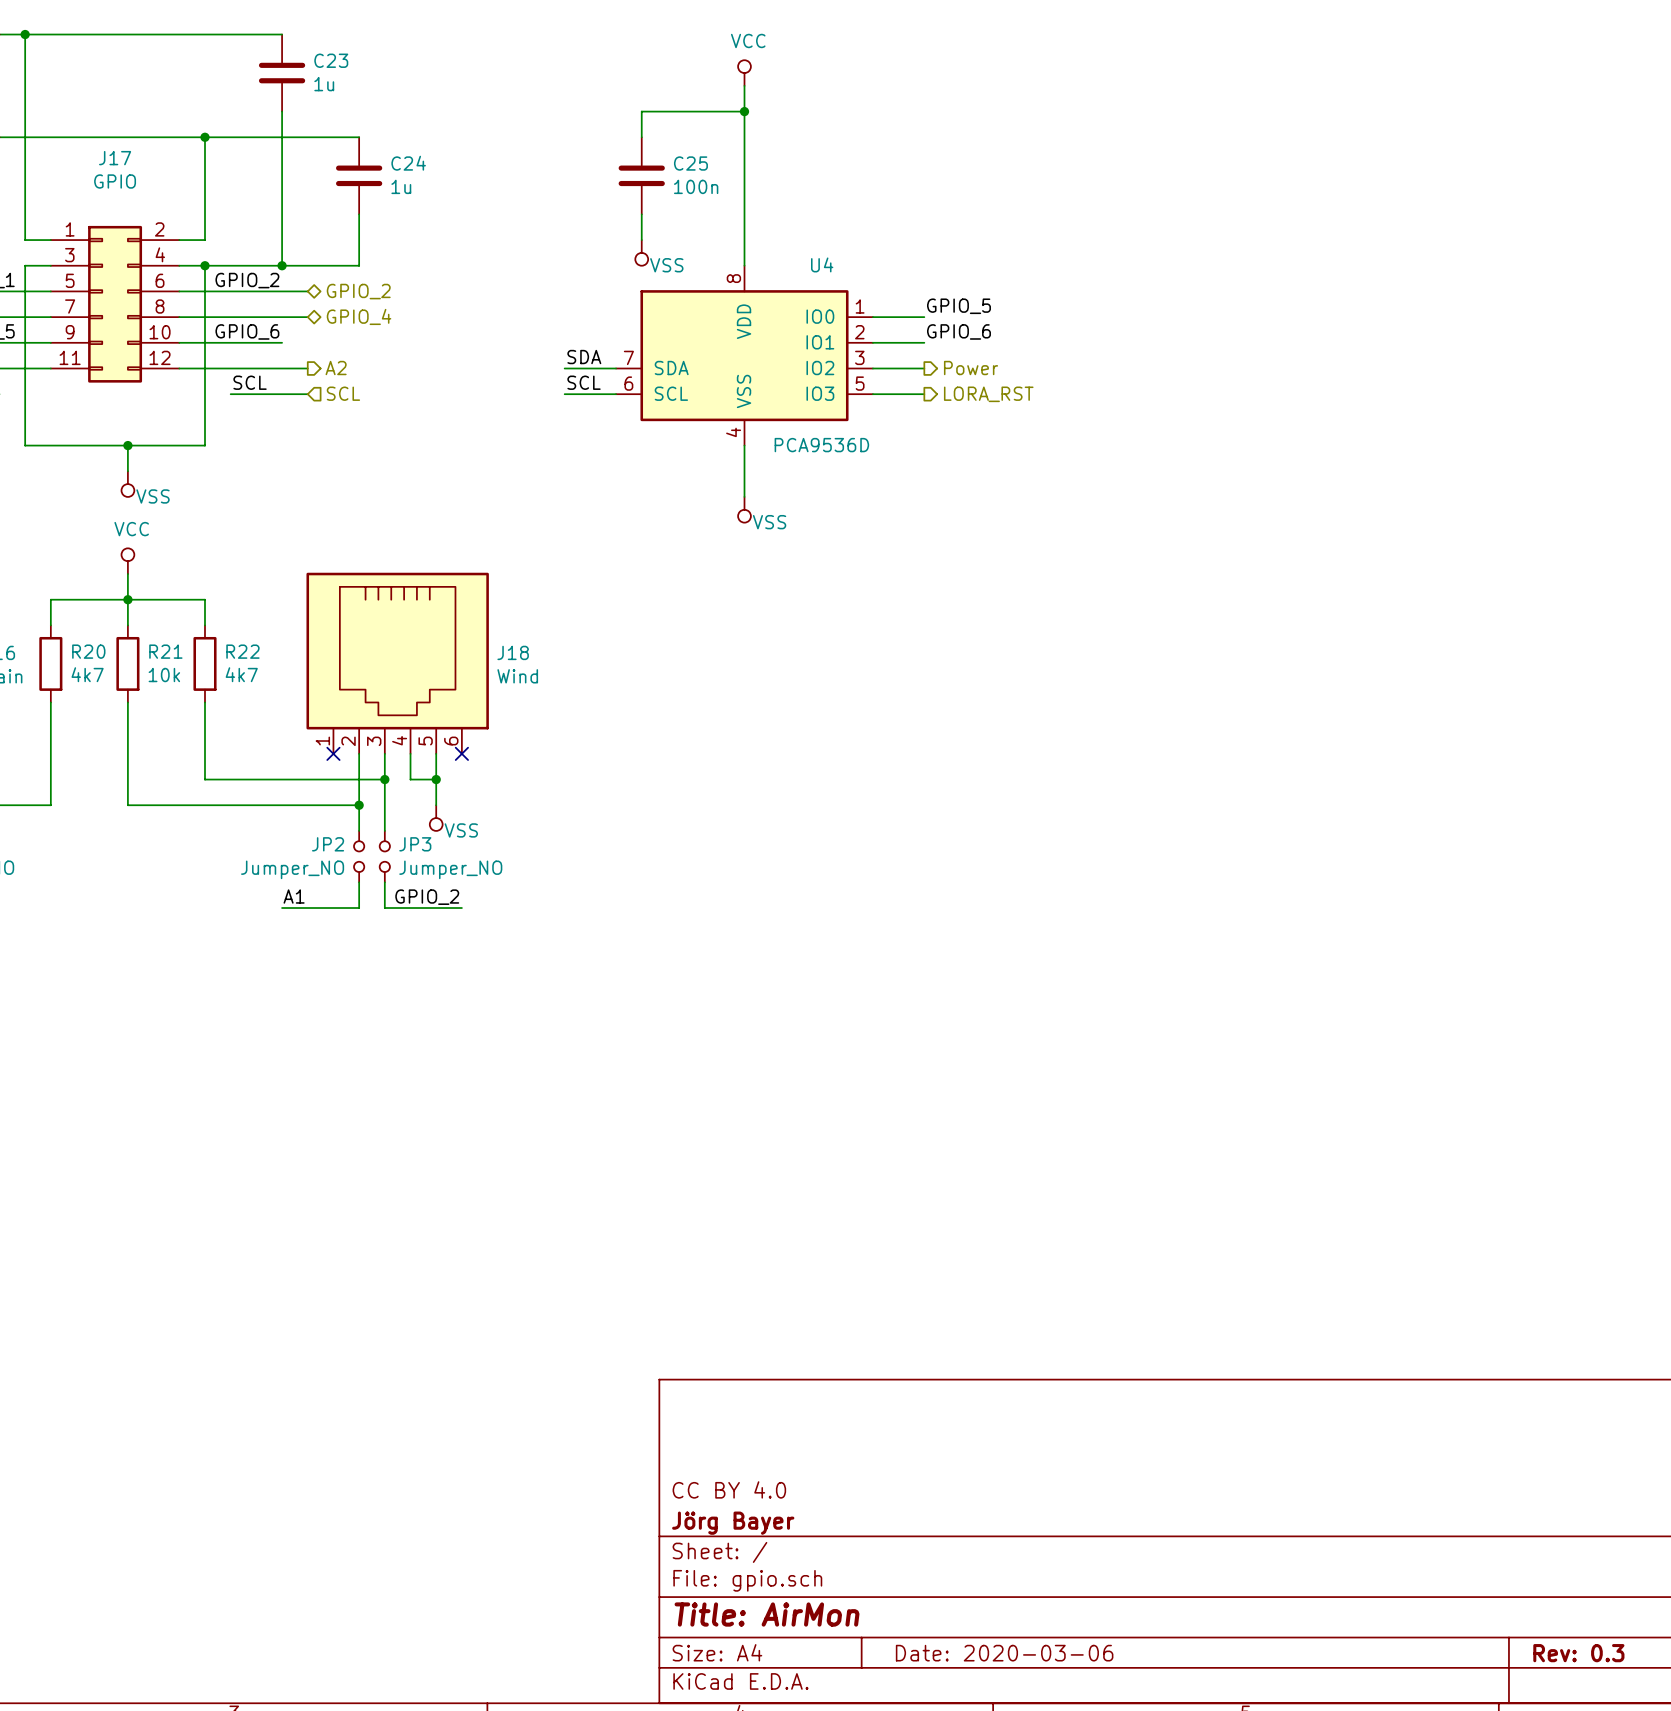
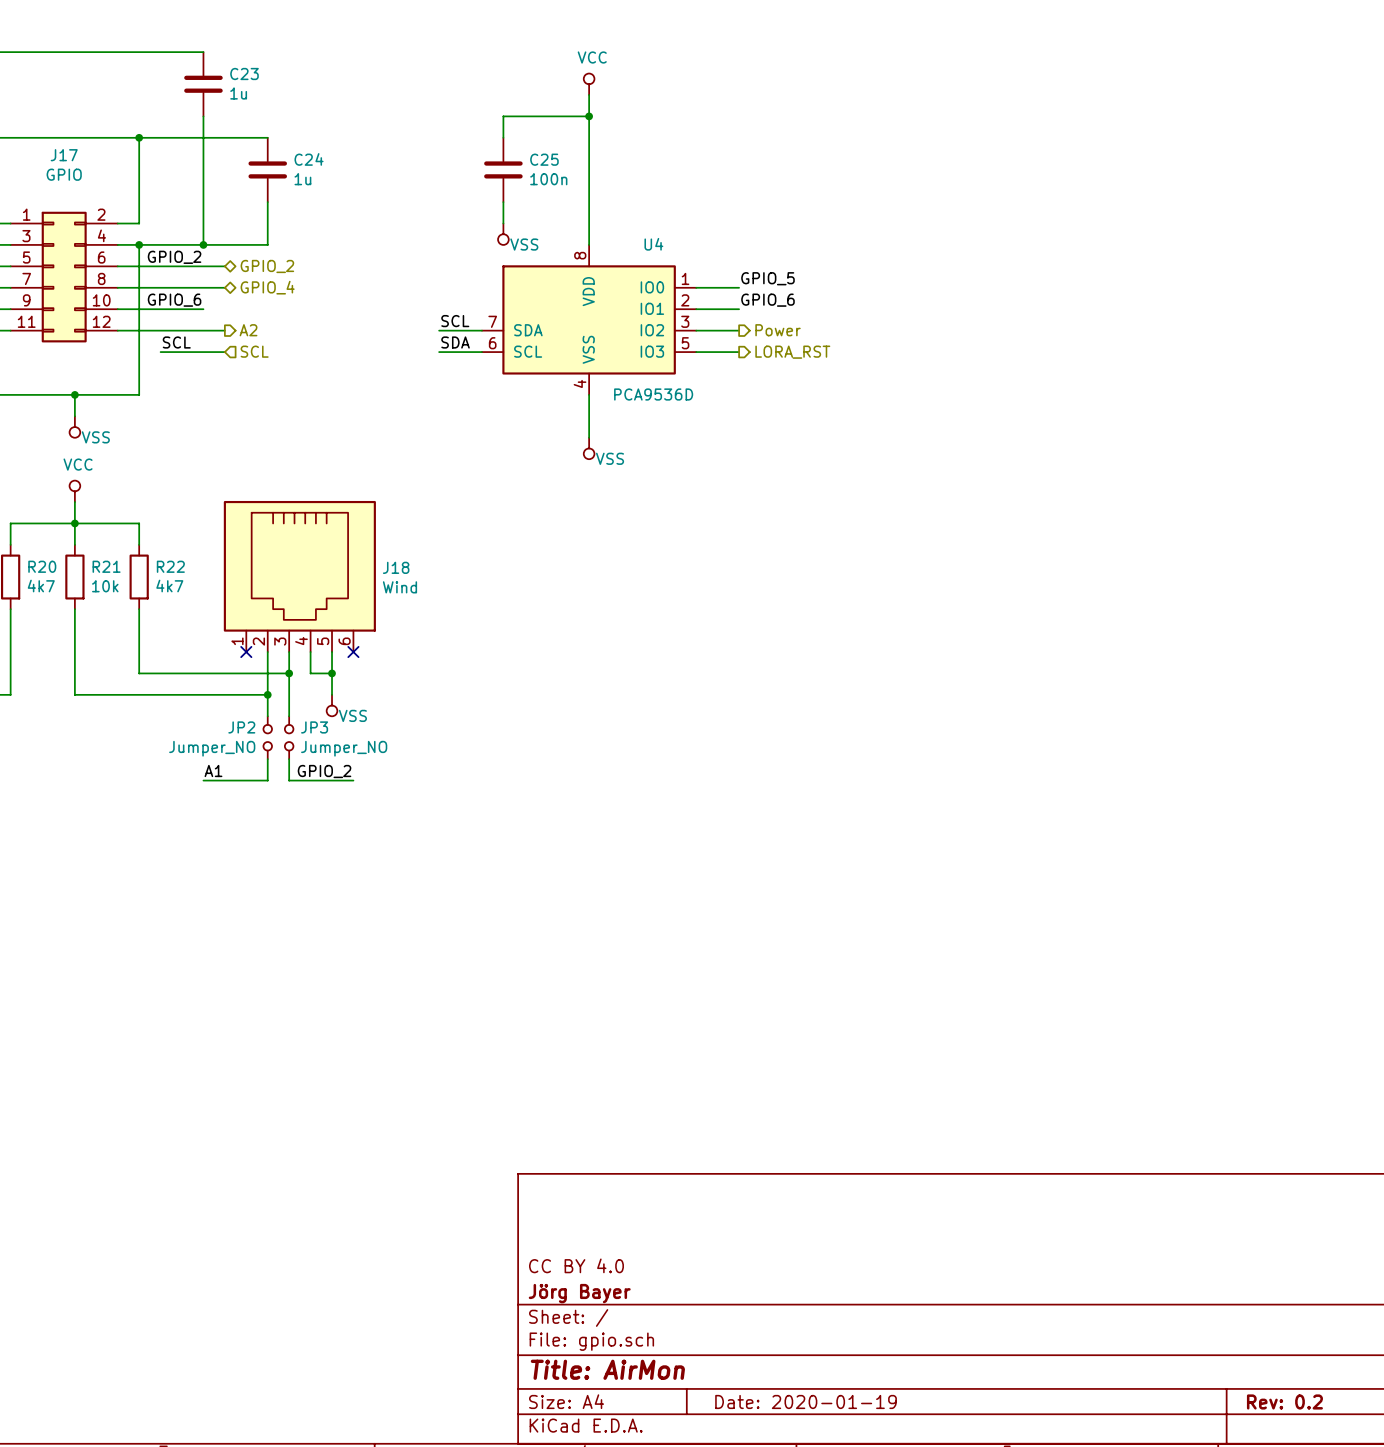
label: SDA (584, 357) -> SCL (455, 321)
label: SCL (584, 382) -> SDA (455, 342)
title block: Date: 2020-03-06 (1004, 1653) -> Date: 2020-01-19 (806, 1401)
title block: Rev: 0.3 (1578, 1653) -> Rev: 0.2 (1284, 1401)

